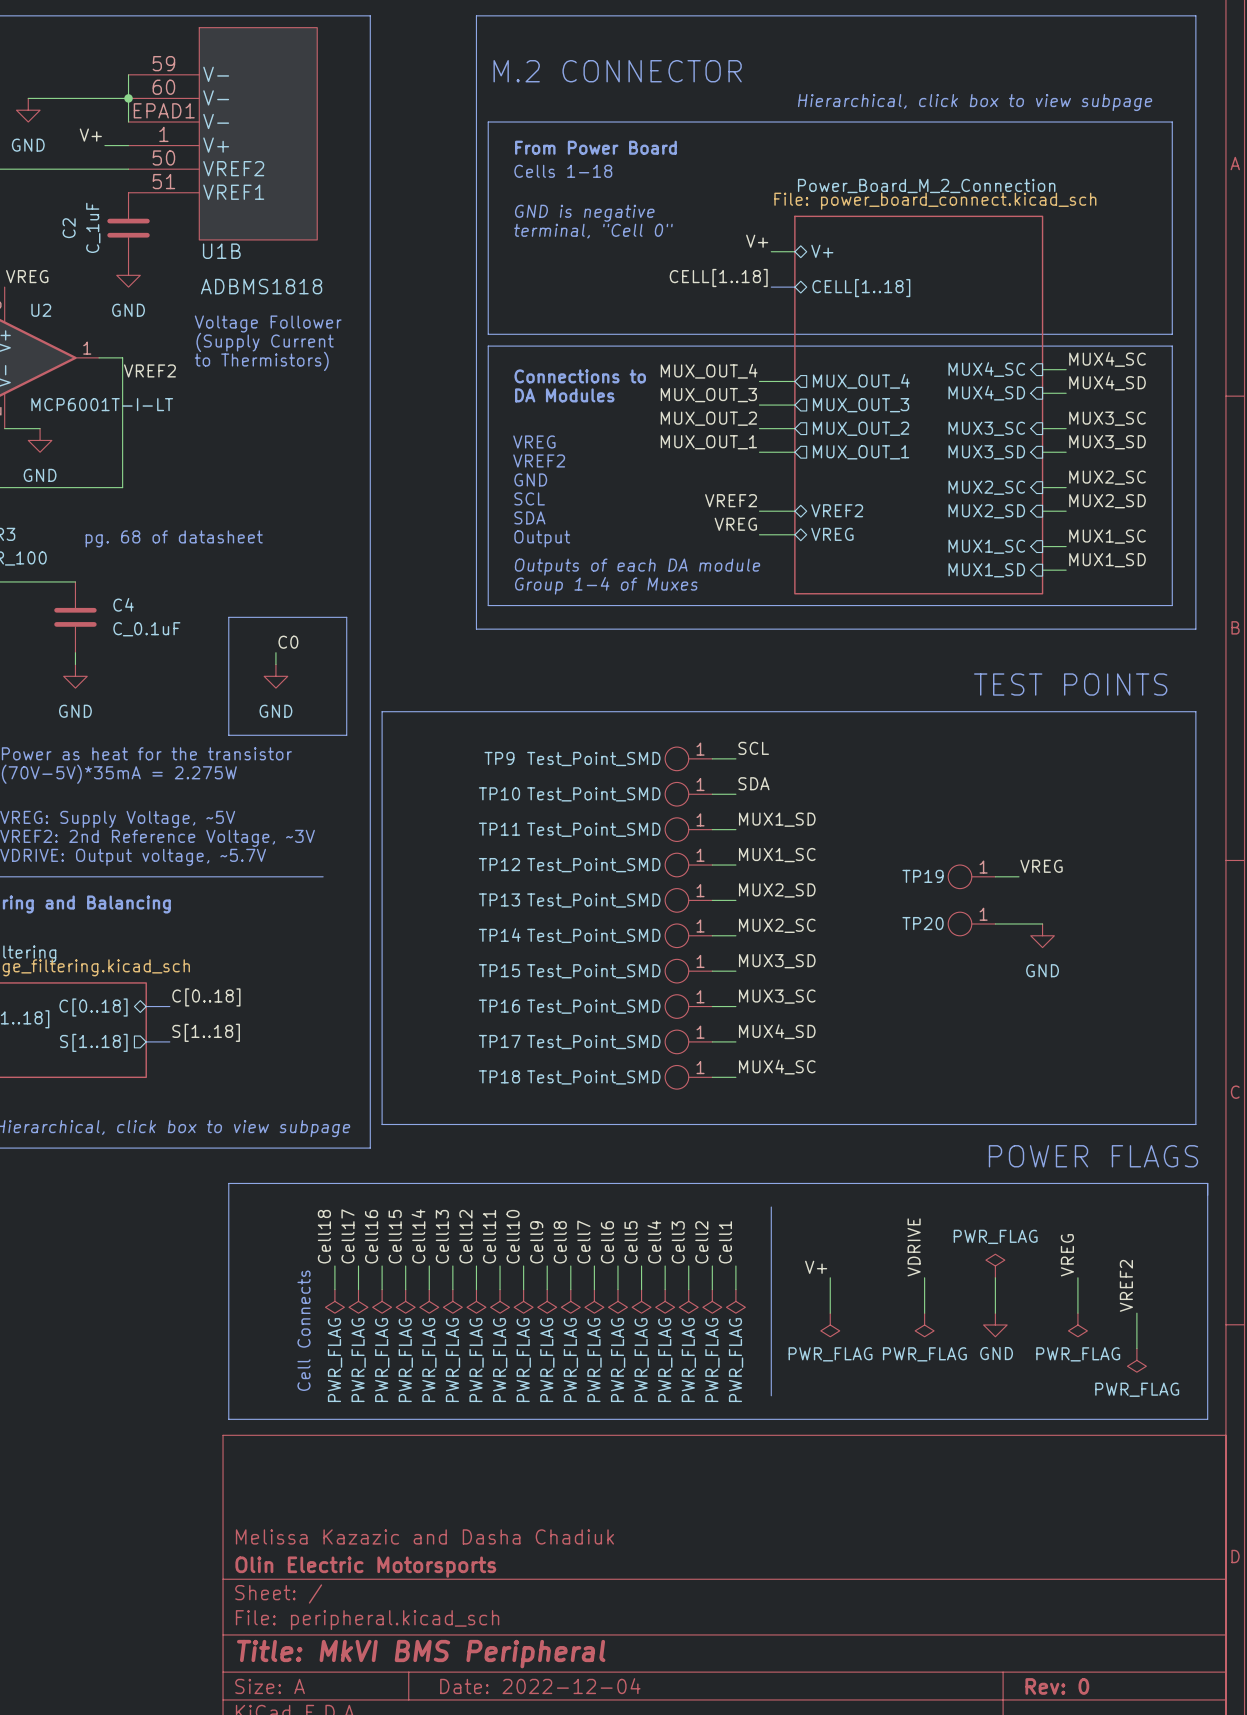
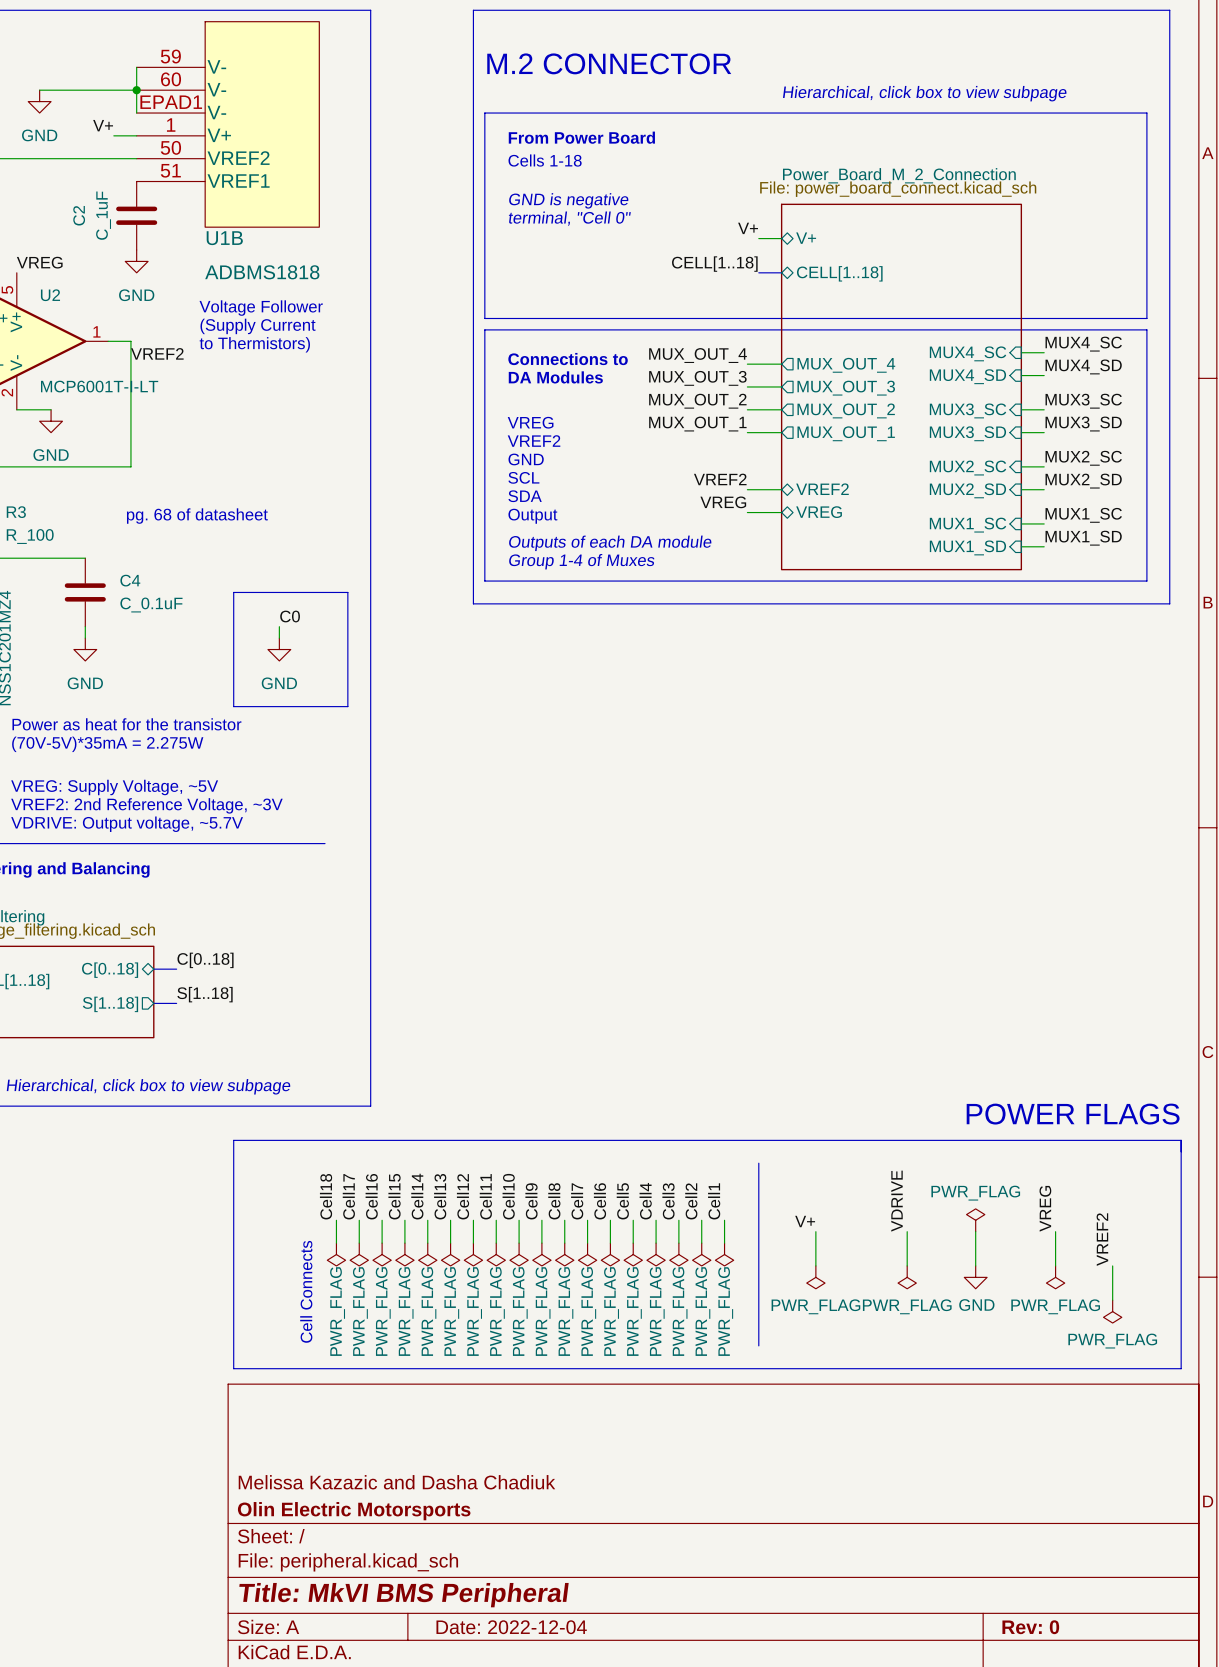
text: TEST POINTS (1070, 684) -> none
line: (382, 711) (382, 1124) (1195, 1124) (1195, 711) (382, 711) -> none
label: SCL (753, 748) -> none
TP9: Test_Point_SMD (688, 758) -> none
wire: (712, 758) (735, 758) -> none
label: SDA (753, 783) -> none
TP10: Test_Point_SMD (688, 794) -> none
wire: (712, 794) (735, 794) -> none
label: MUX1_SD (777, 819) -> none
TP11: Test_Point_SMD (688, 829) -> none
wire: (712, 829) (735, 829) -> none
label: MUX1_SC (777, 855) -> none
TP12: Test_Point_SMD (688, 865) -> none
wire: (712, 865) (735, 865) -> none
label: VREG (1041, 866) -> none
TP19: (971, 876) -> none
wire: (995, 876) (1018, 876) -> none
label: MUX2_SD (777, 890) -> none
TP13: Test_Point_SMD (688, 900) -> none
wire: (712, 900) (735, 900) -> none
TP20: (971, 923) -> none
wire: (995, 923) (1042, 923) -> none
label: MUX2_SC (777, 925) -> none
TP14: Test_Point_SMD (688, 935) -> none
wire: (712, 935) (735, 935) -> none
power symbol: GND (1042, 935) -> none
label: MUX3_SD (777, 961) -> none
TP15: Test_Point_SMD (688, 971) -> none
wire: (712, 971) (735, 971) -> none
label: MUX3_SC (777, 996) -> none
TP16: Test_Point_SMD (688, 1006) -> none
wire: (712, 1006) (735, 1006) -> none
label: MUX4_SD (777, 1031) -> none
TP17: Test_Point_SMD (688, 1041) -> none
wire: (712, 1041) (735, 1041) -> none
label: MUX4_SC (777, 1067) -> none
TP18: Test_Point_SMD (688, 1077) -> none
wire: (712, 1077) (735, 1077) -> none

